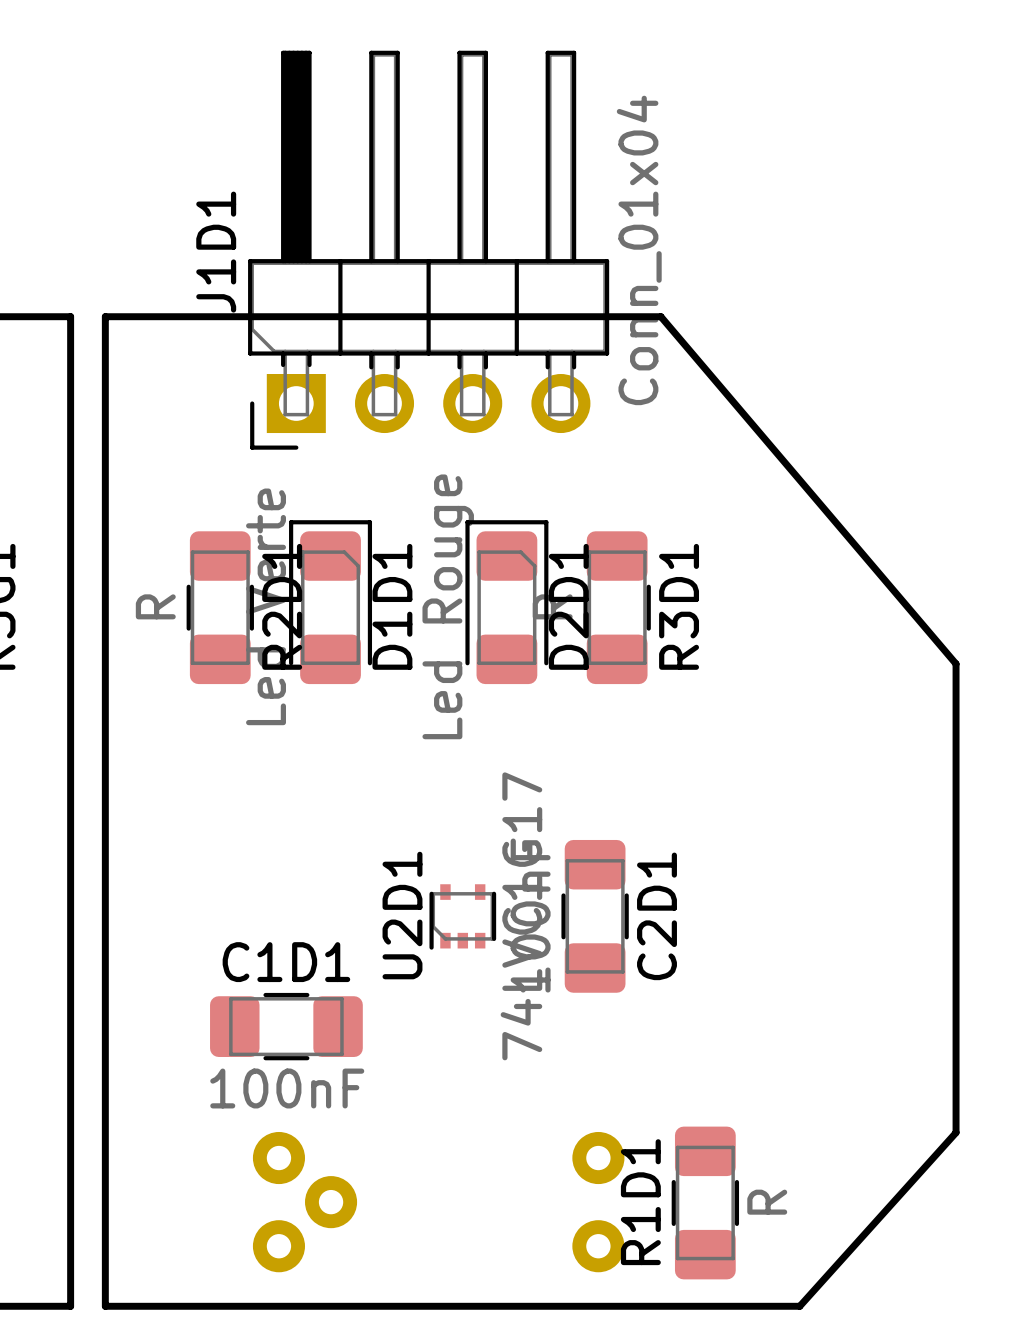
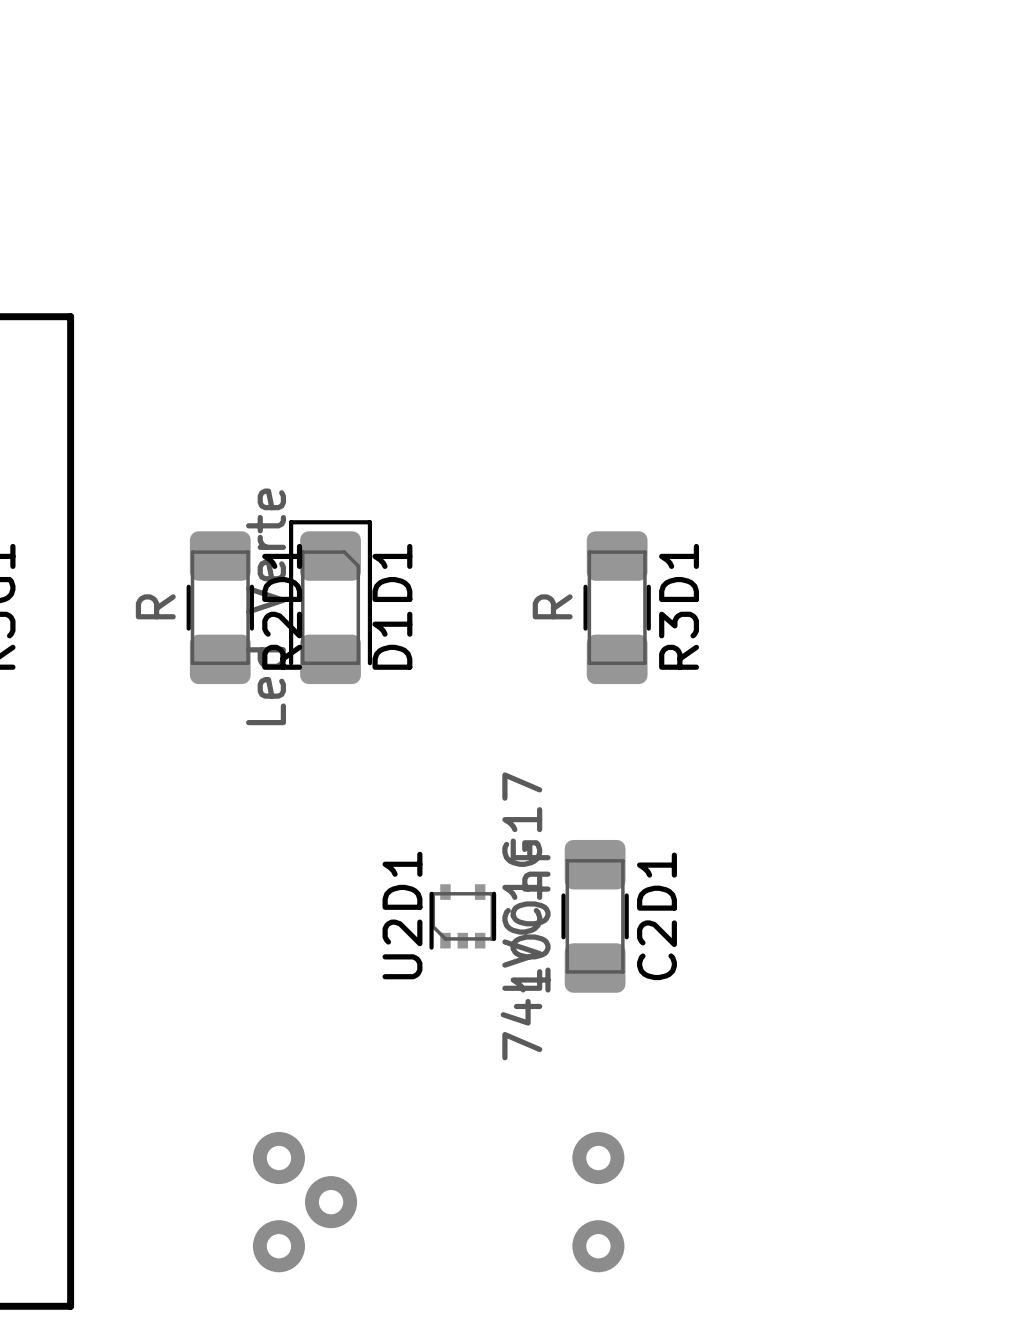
J1D1: Conn_01x04 (428, 250) -> none
board edge: (105, 316) (660, 316) (956, 663) (956, 1132) (799, 1306) (105, 1306) (105, 316) -> none
D2D1: Led Rouge (506, 602) -> none
C1D1: 100nF (286, 1026) -> none
R1D1: R (705, 1202) -> none

